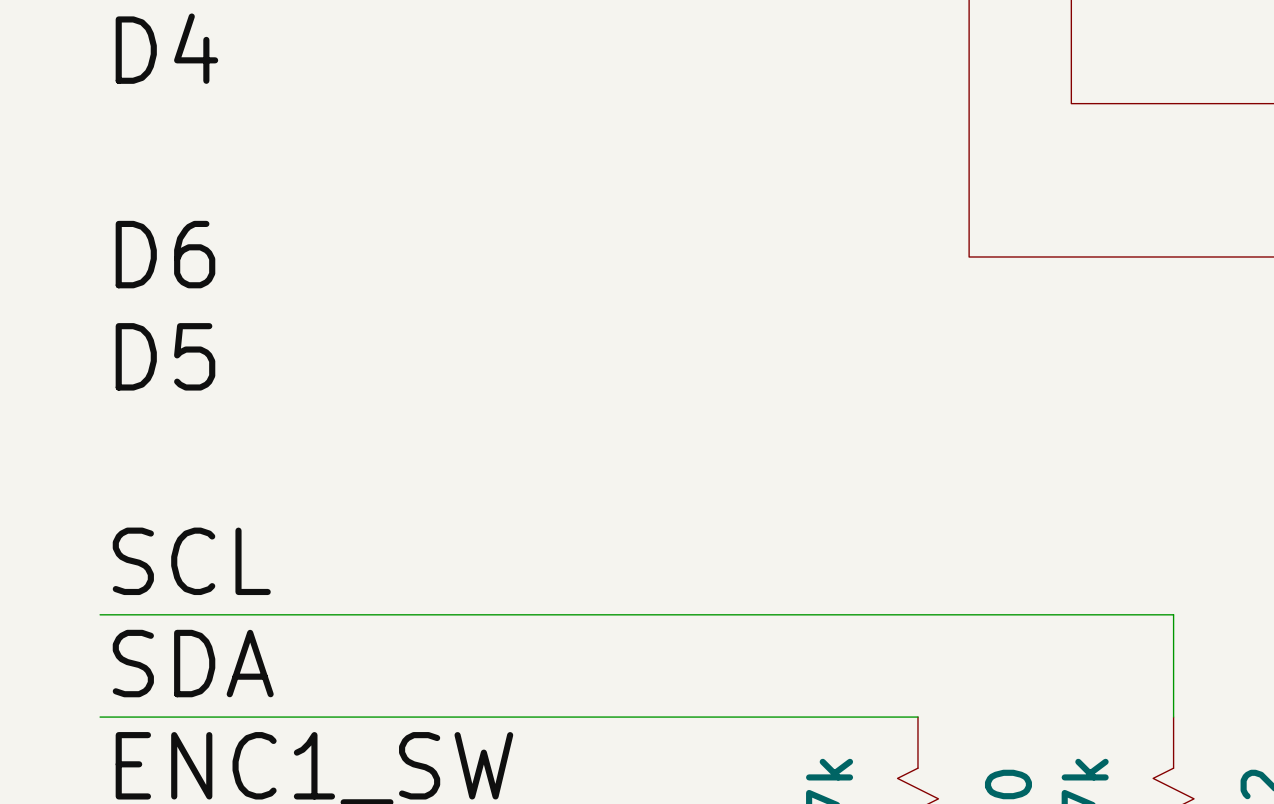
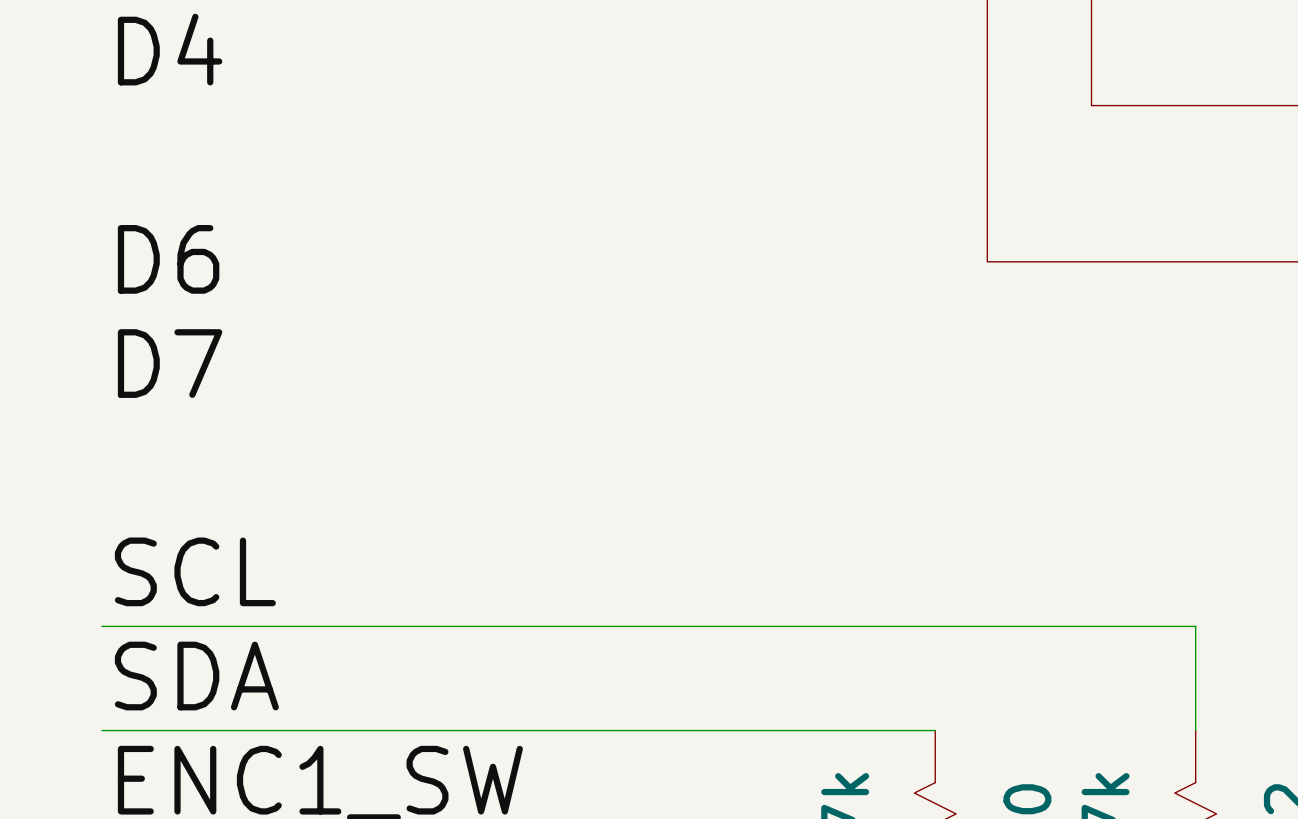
label: D5 (165, 356) -> D7 (170, 363)

